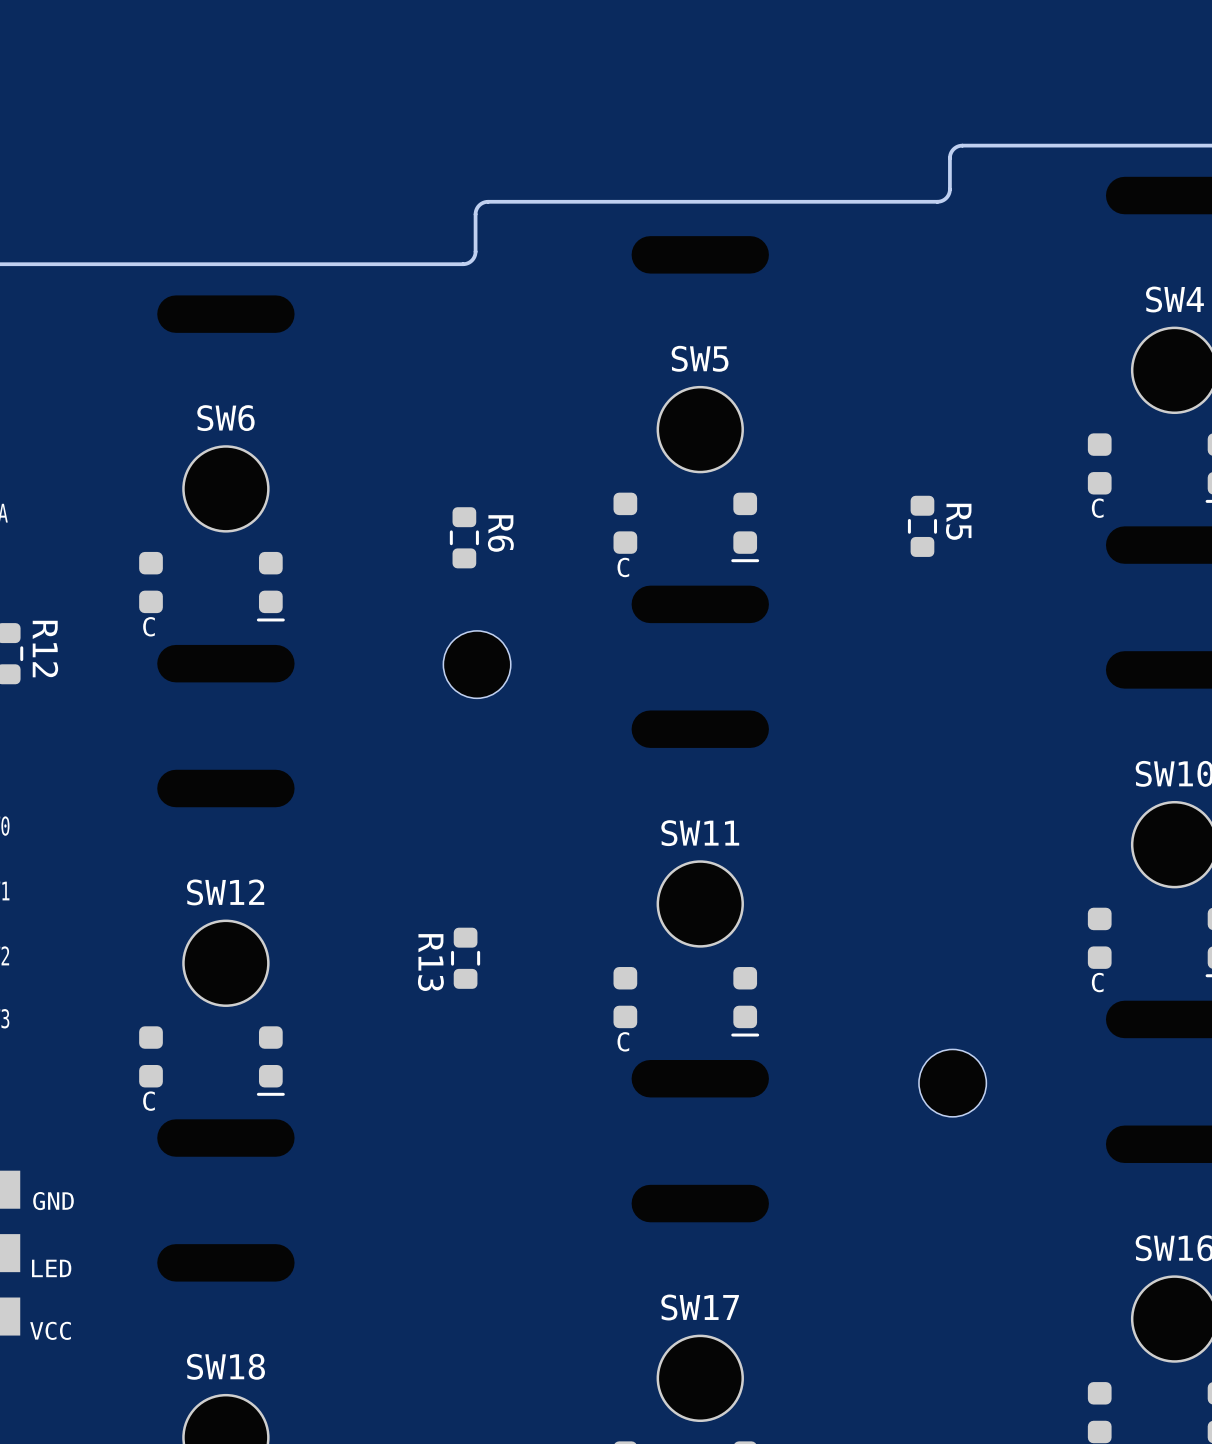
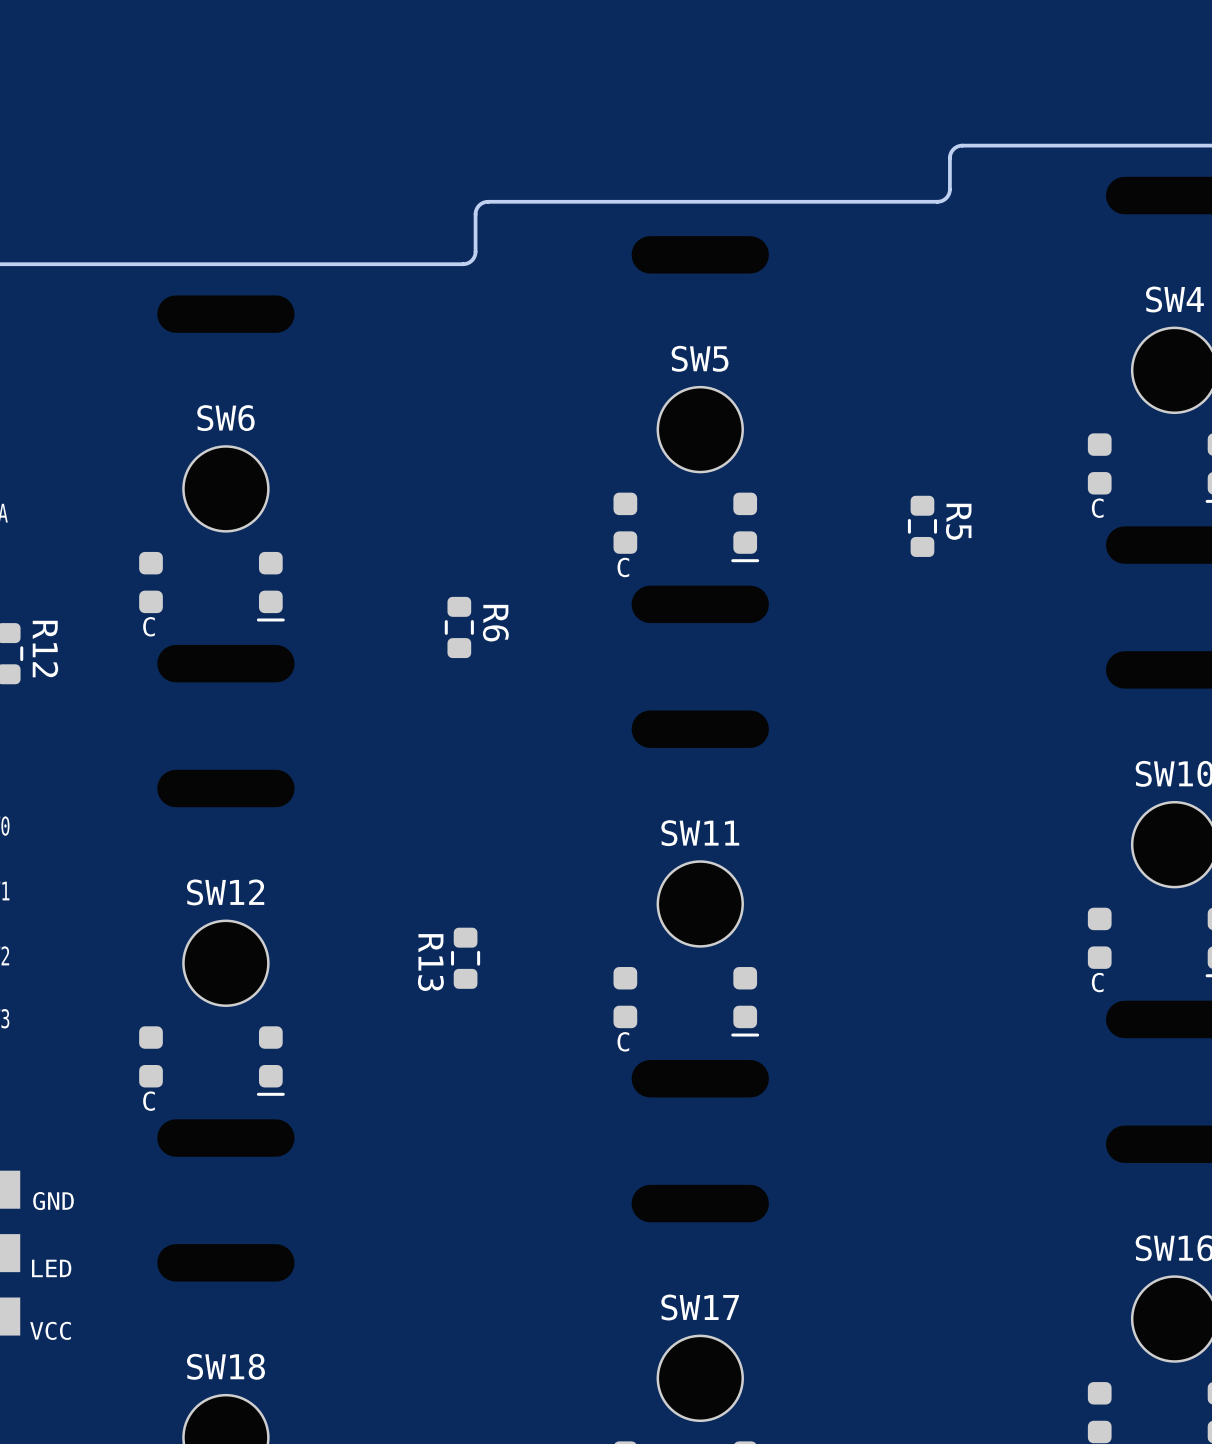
R6 position: (464, 537) -> (459, 627)
part: (477, 664) -> none
part: (952, 1083) -> none

